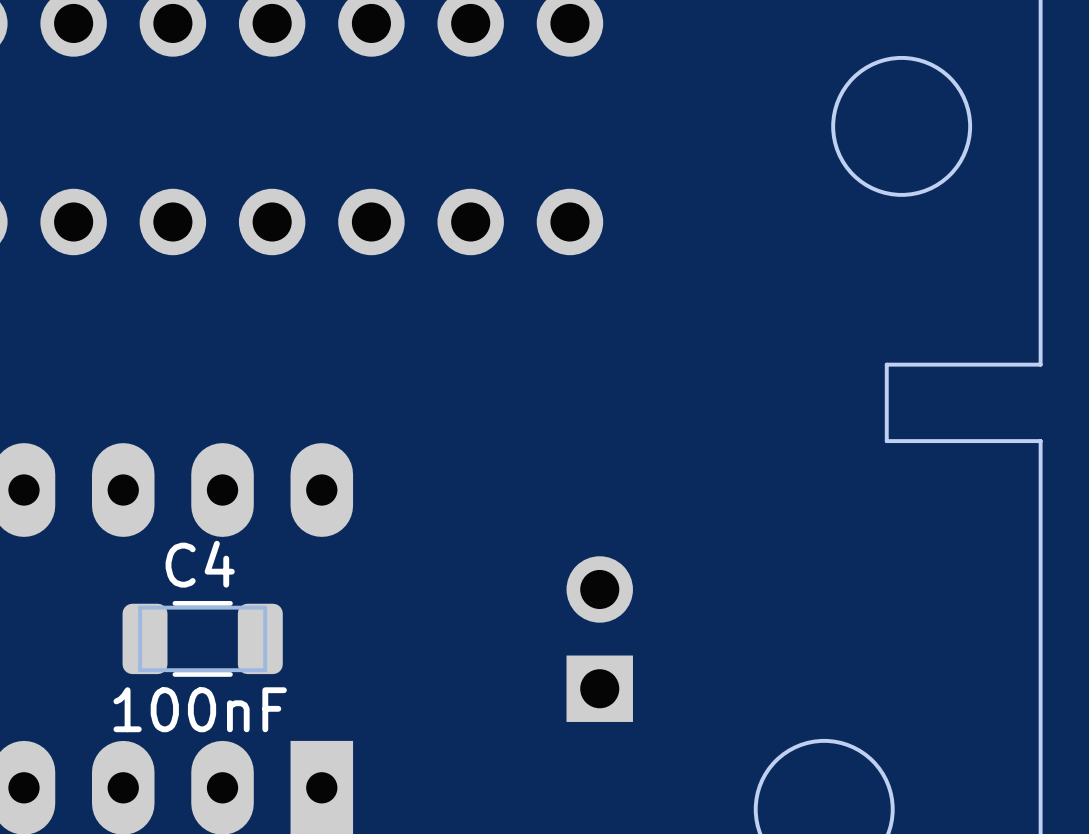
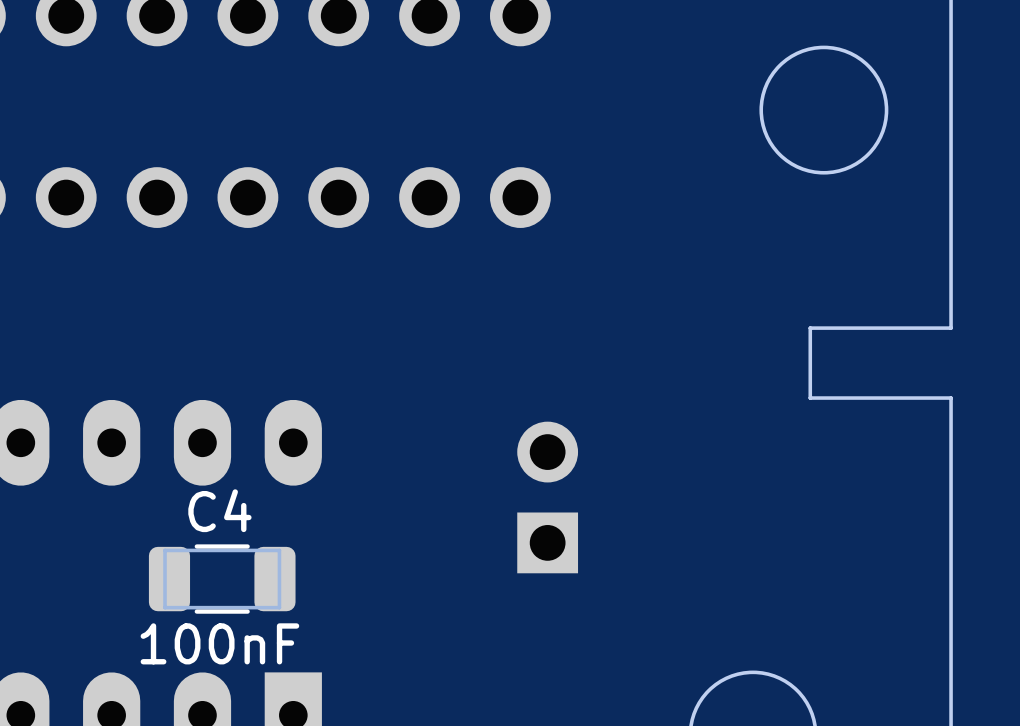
C4 position: (202, 638) -> (222, 579)
part position: (599, 639) -> (547, 497)

